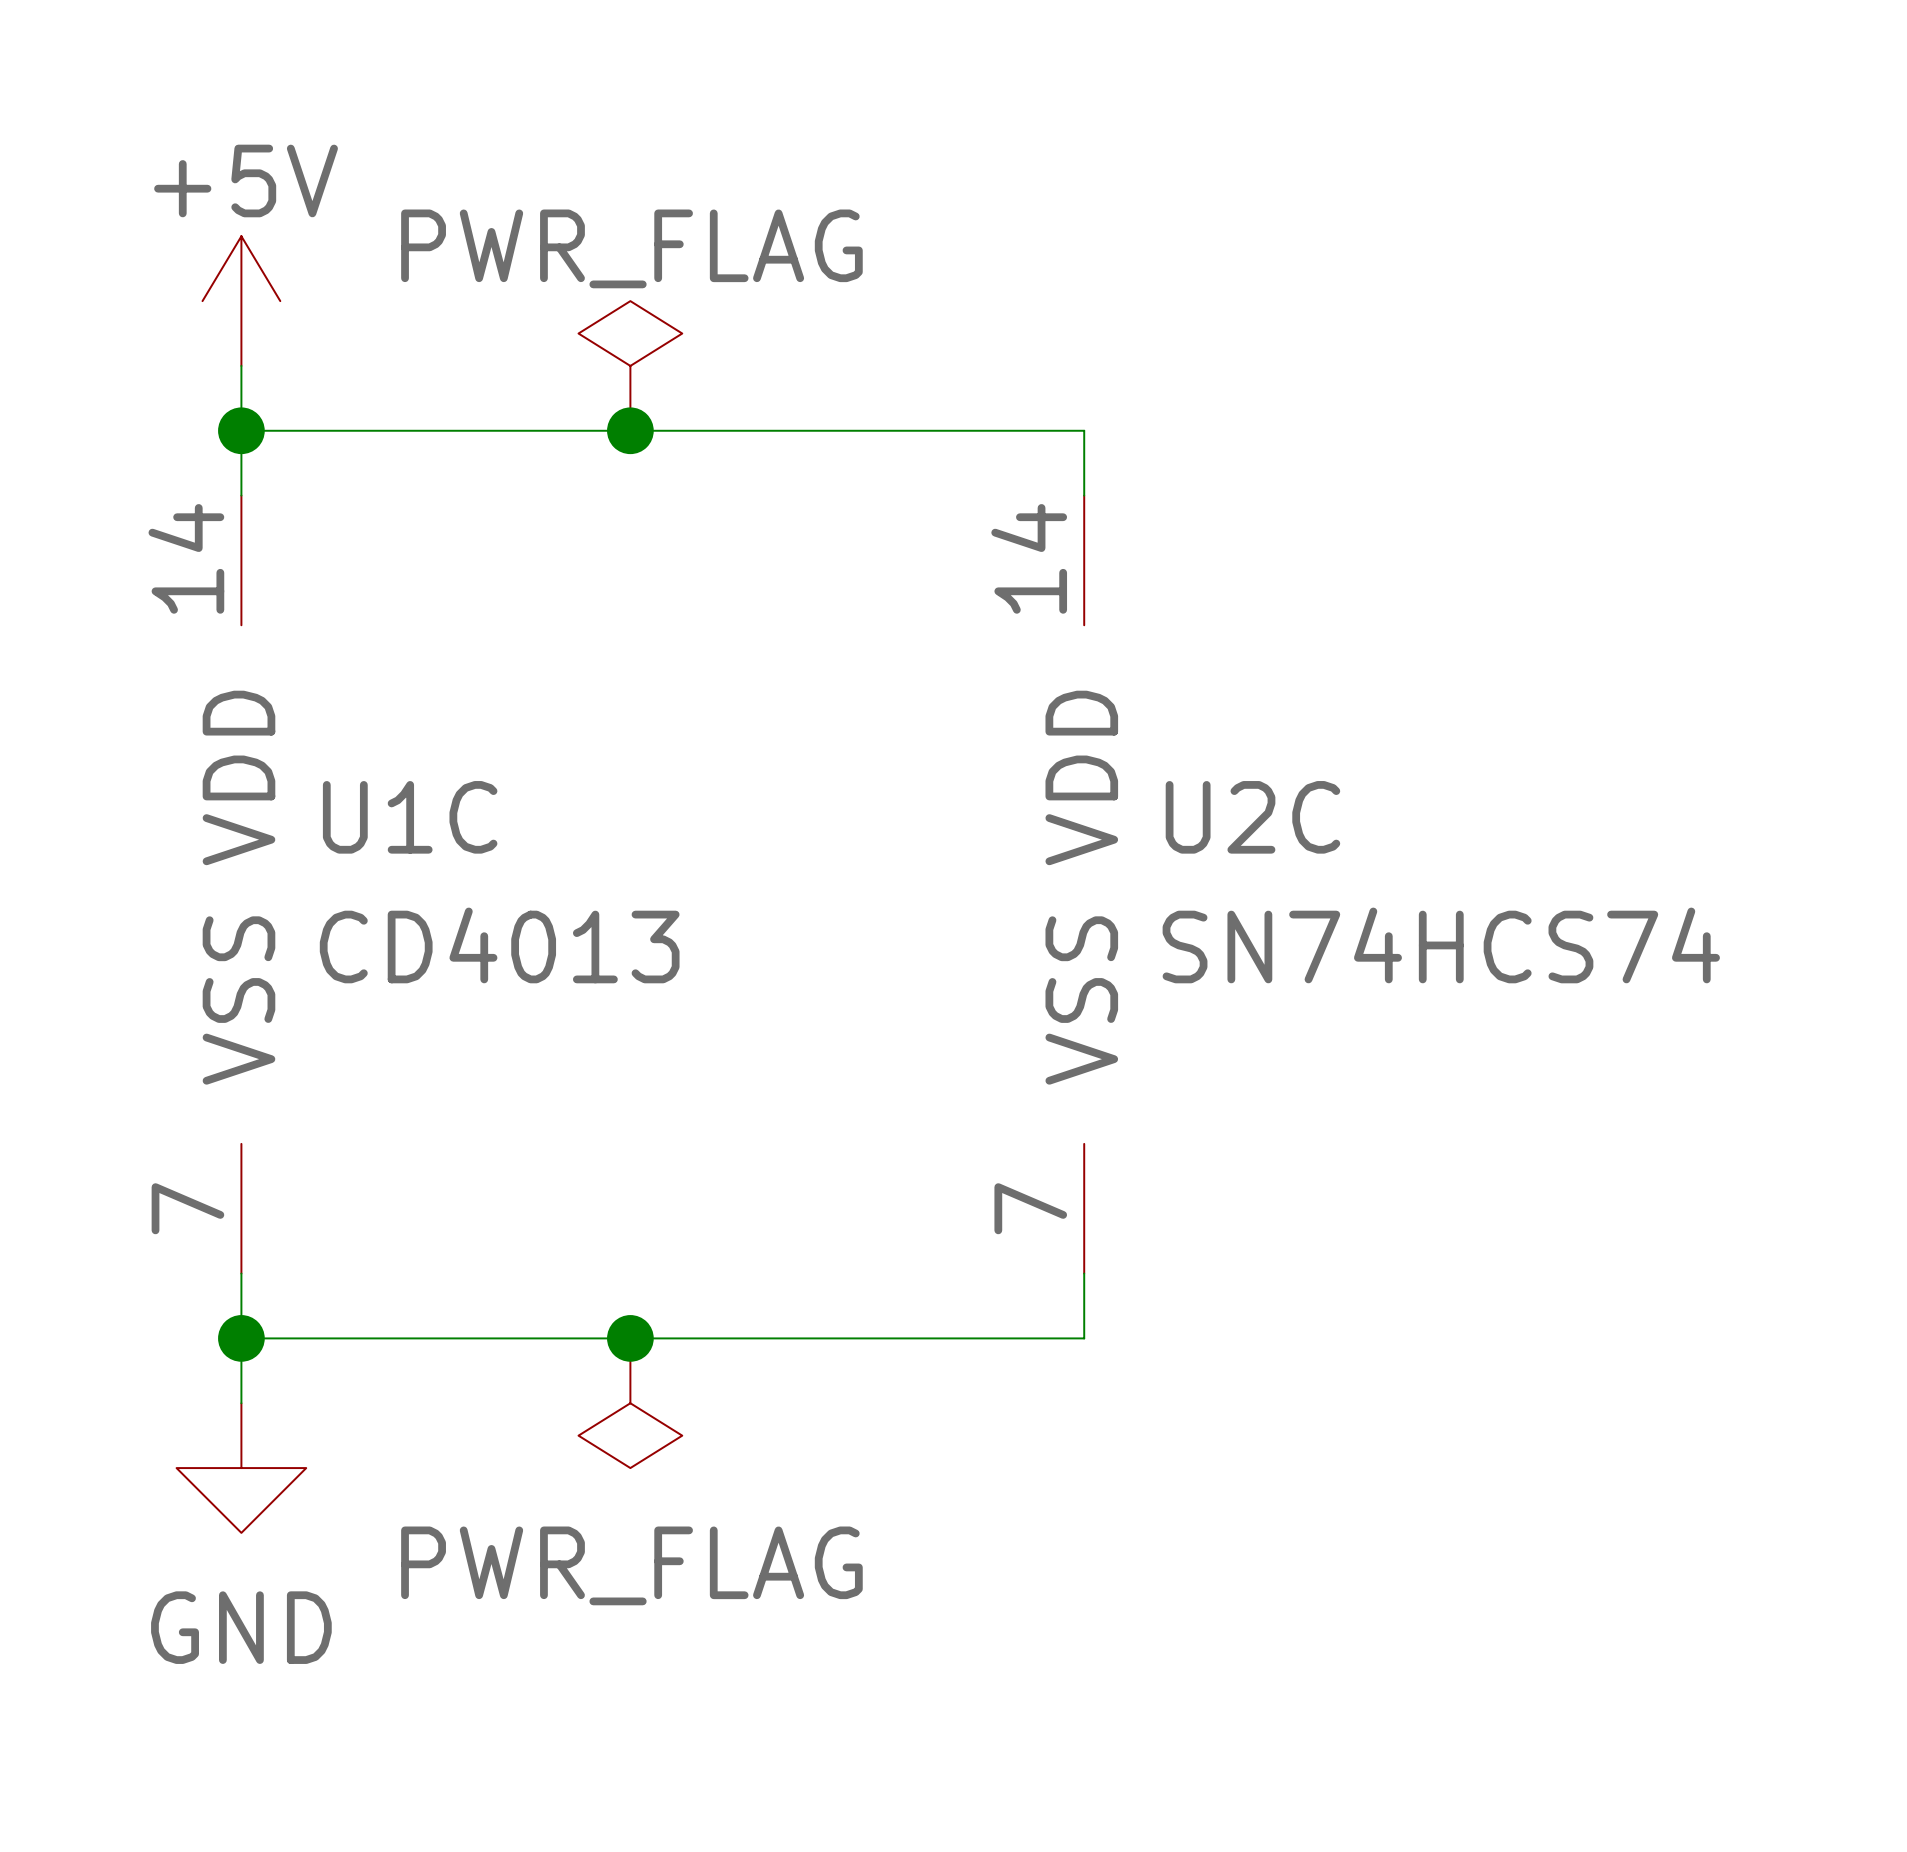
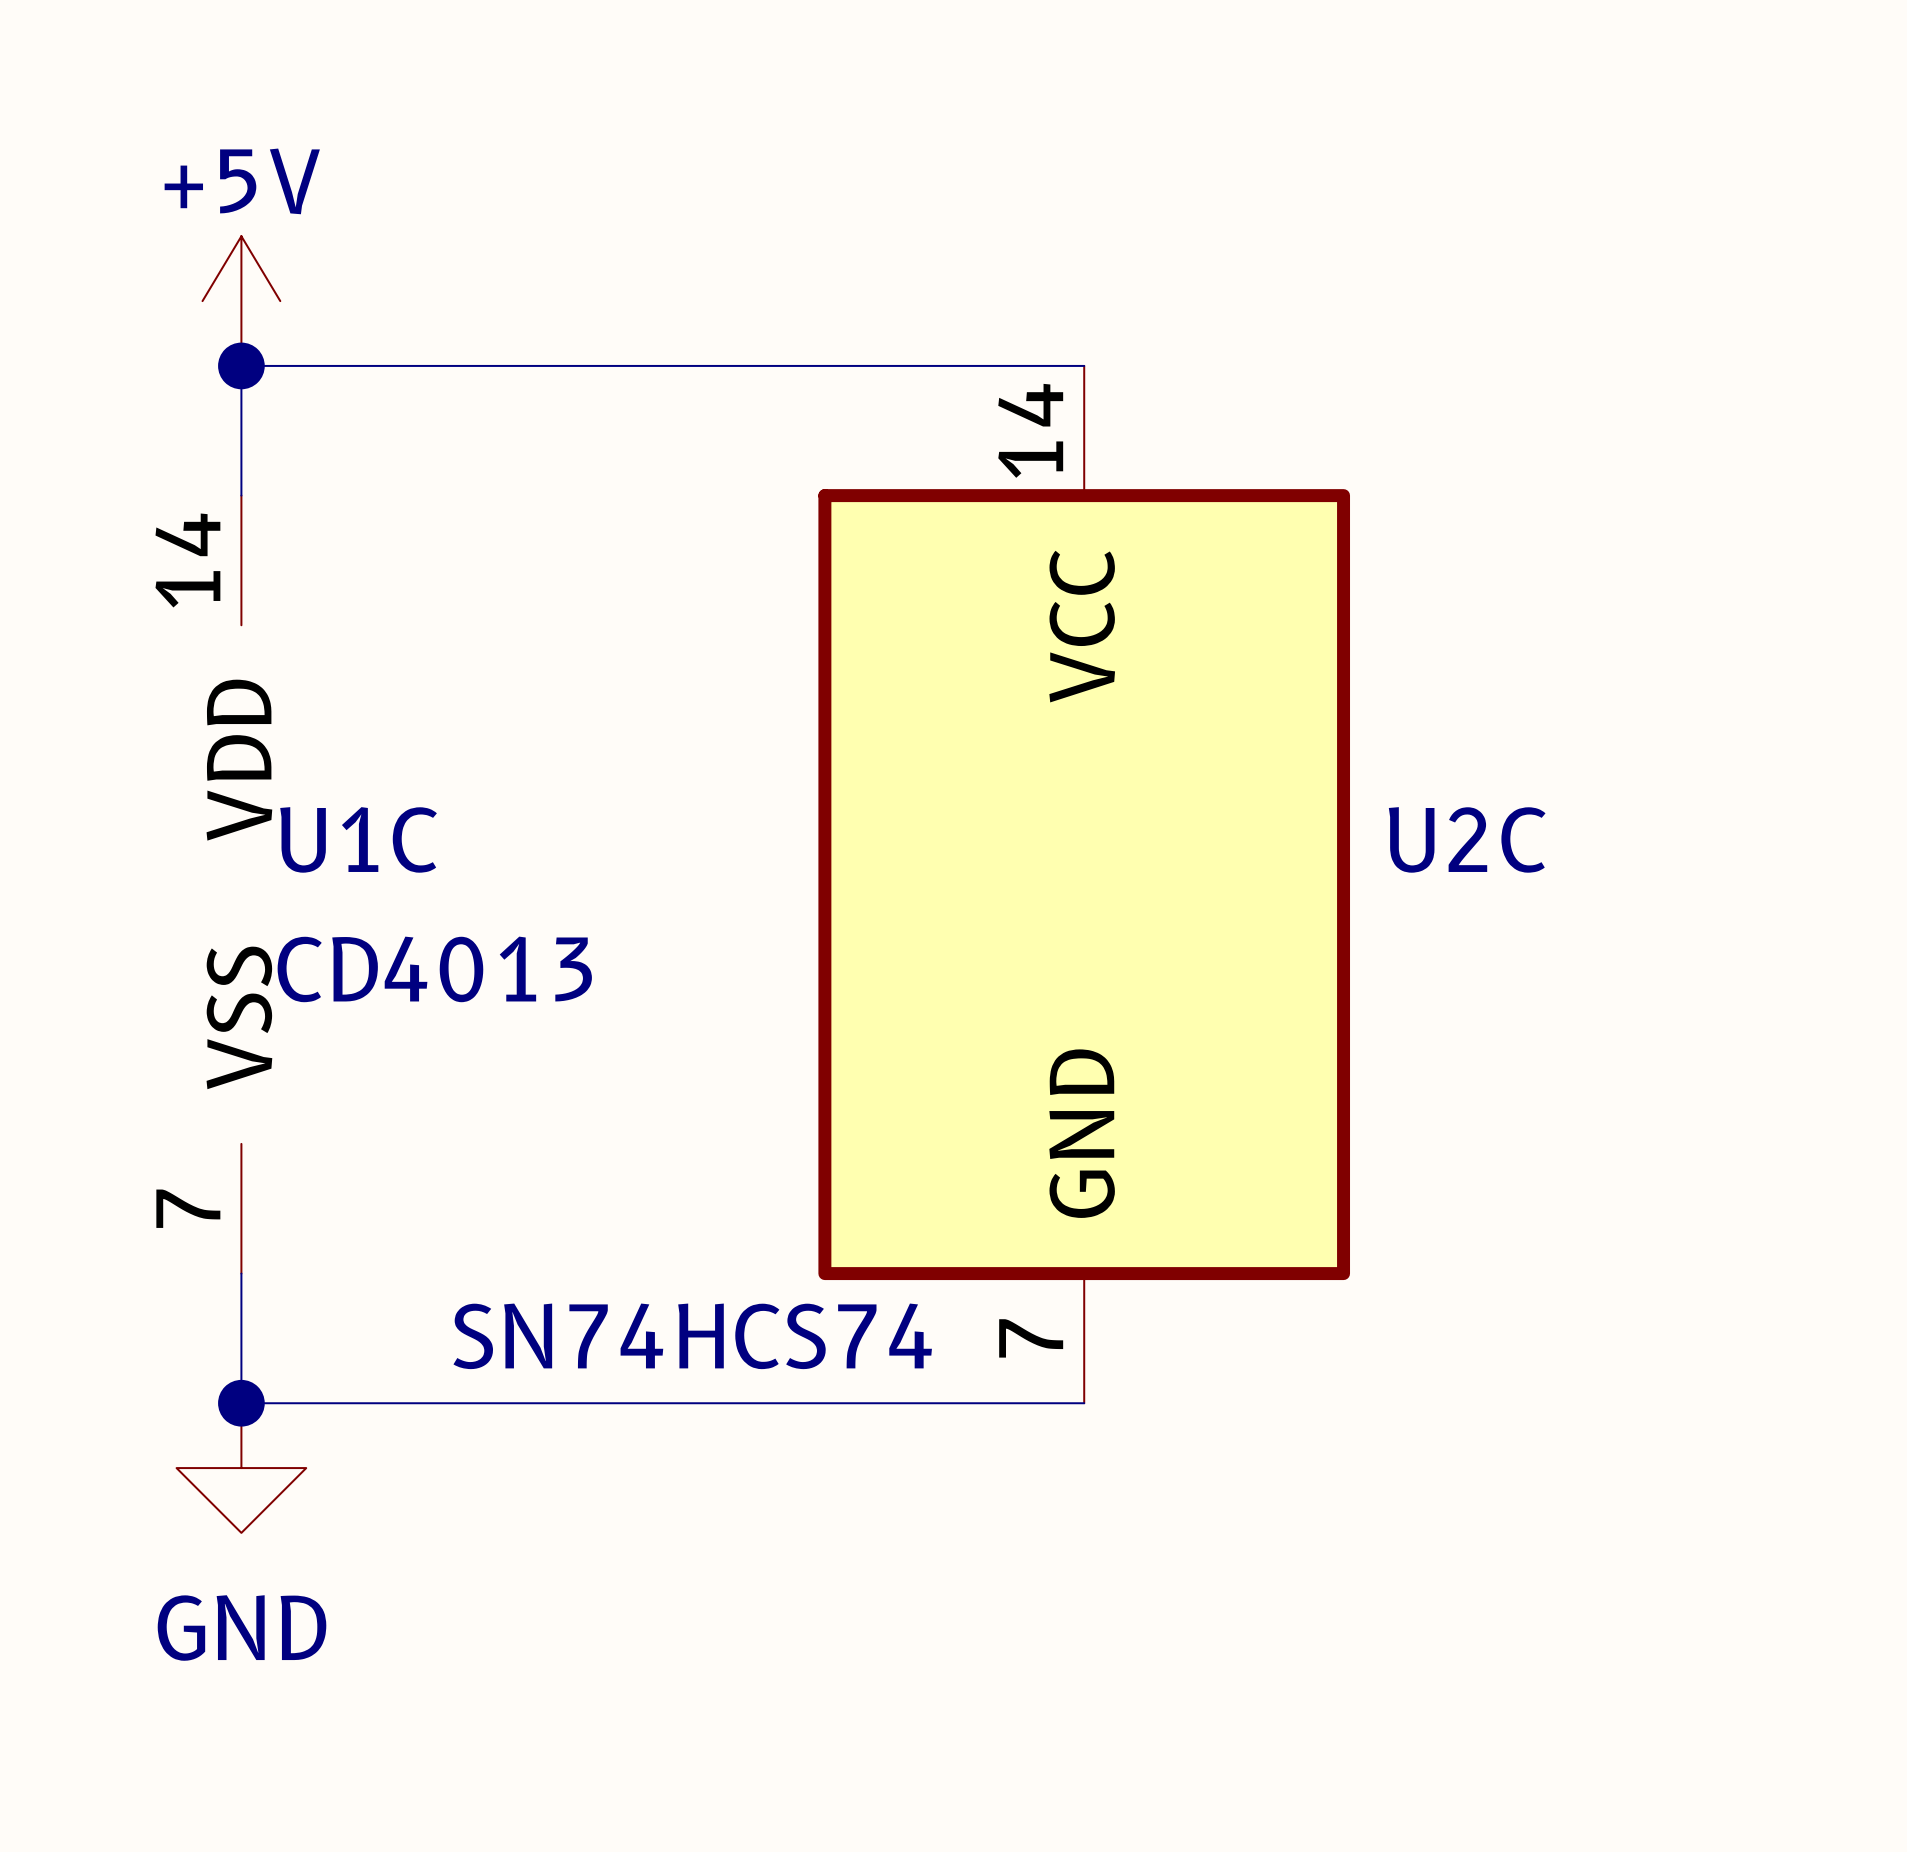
wire: none -> (241, 365) (1084, 365)
power symbol: PWR_FLAG (630, 365) -> none
wire: (241, 430) (1084, 430) (1084, 495) -> none
junction position: (241, 430) -> (241, 365)
junction: (630, 430) -> none
U2C symbol: [1084, 495, 1085, 1274] -> [818, 365, 1351, 1404]
U1C name position: U1C (410, 817) -> U1C (358, 839)
U2C name position: U2C (1252, 817) -> U2C (1467, 839)
U1C value position: CD4013 (499, 945) -> CD4013 (434, 969)
U2C value position: SN74HCS74 (1441, 945) -> SN74HCS74 (692, 1336)
wire: (1084, 1273) (1084, 1338) (241, 1338) -> none
junction position: (241, 1338) -> (241, 1403)
junction: (630, 1338) -> none
wire: none -> (241, 1403) (1084, 1403)
power symbol: PWR_FLAG (630, 1403) -> none

